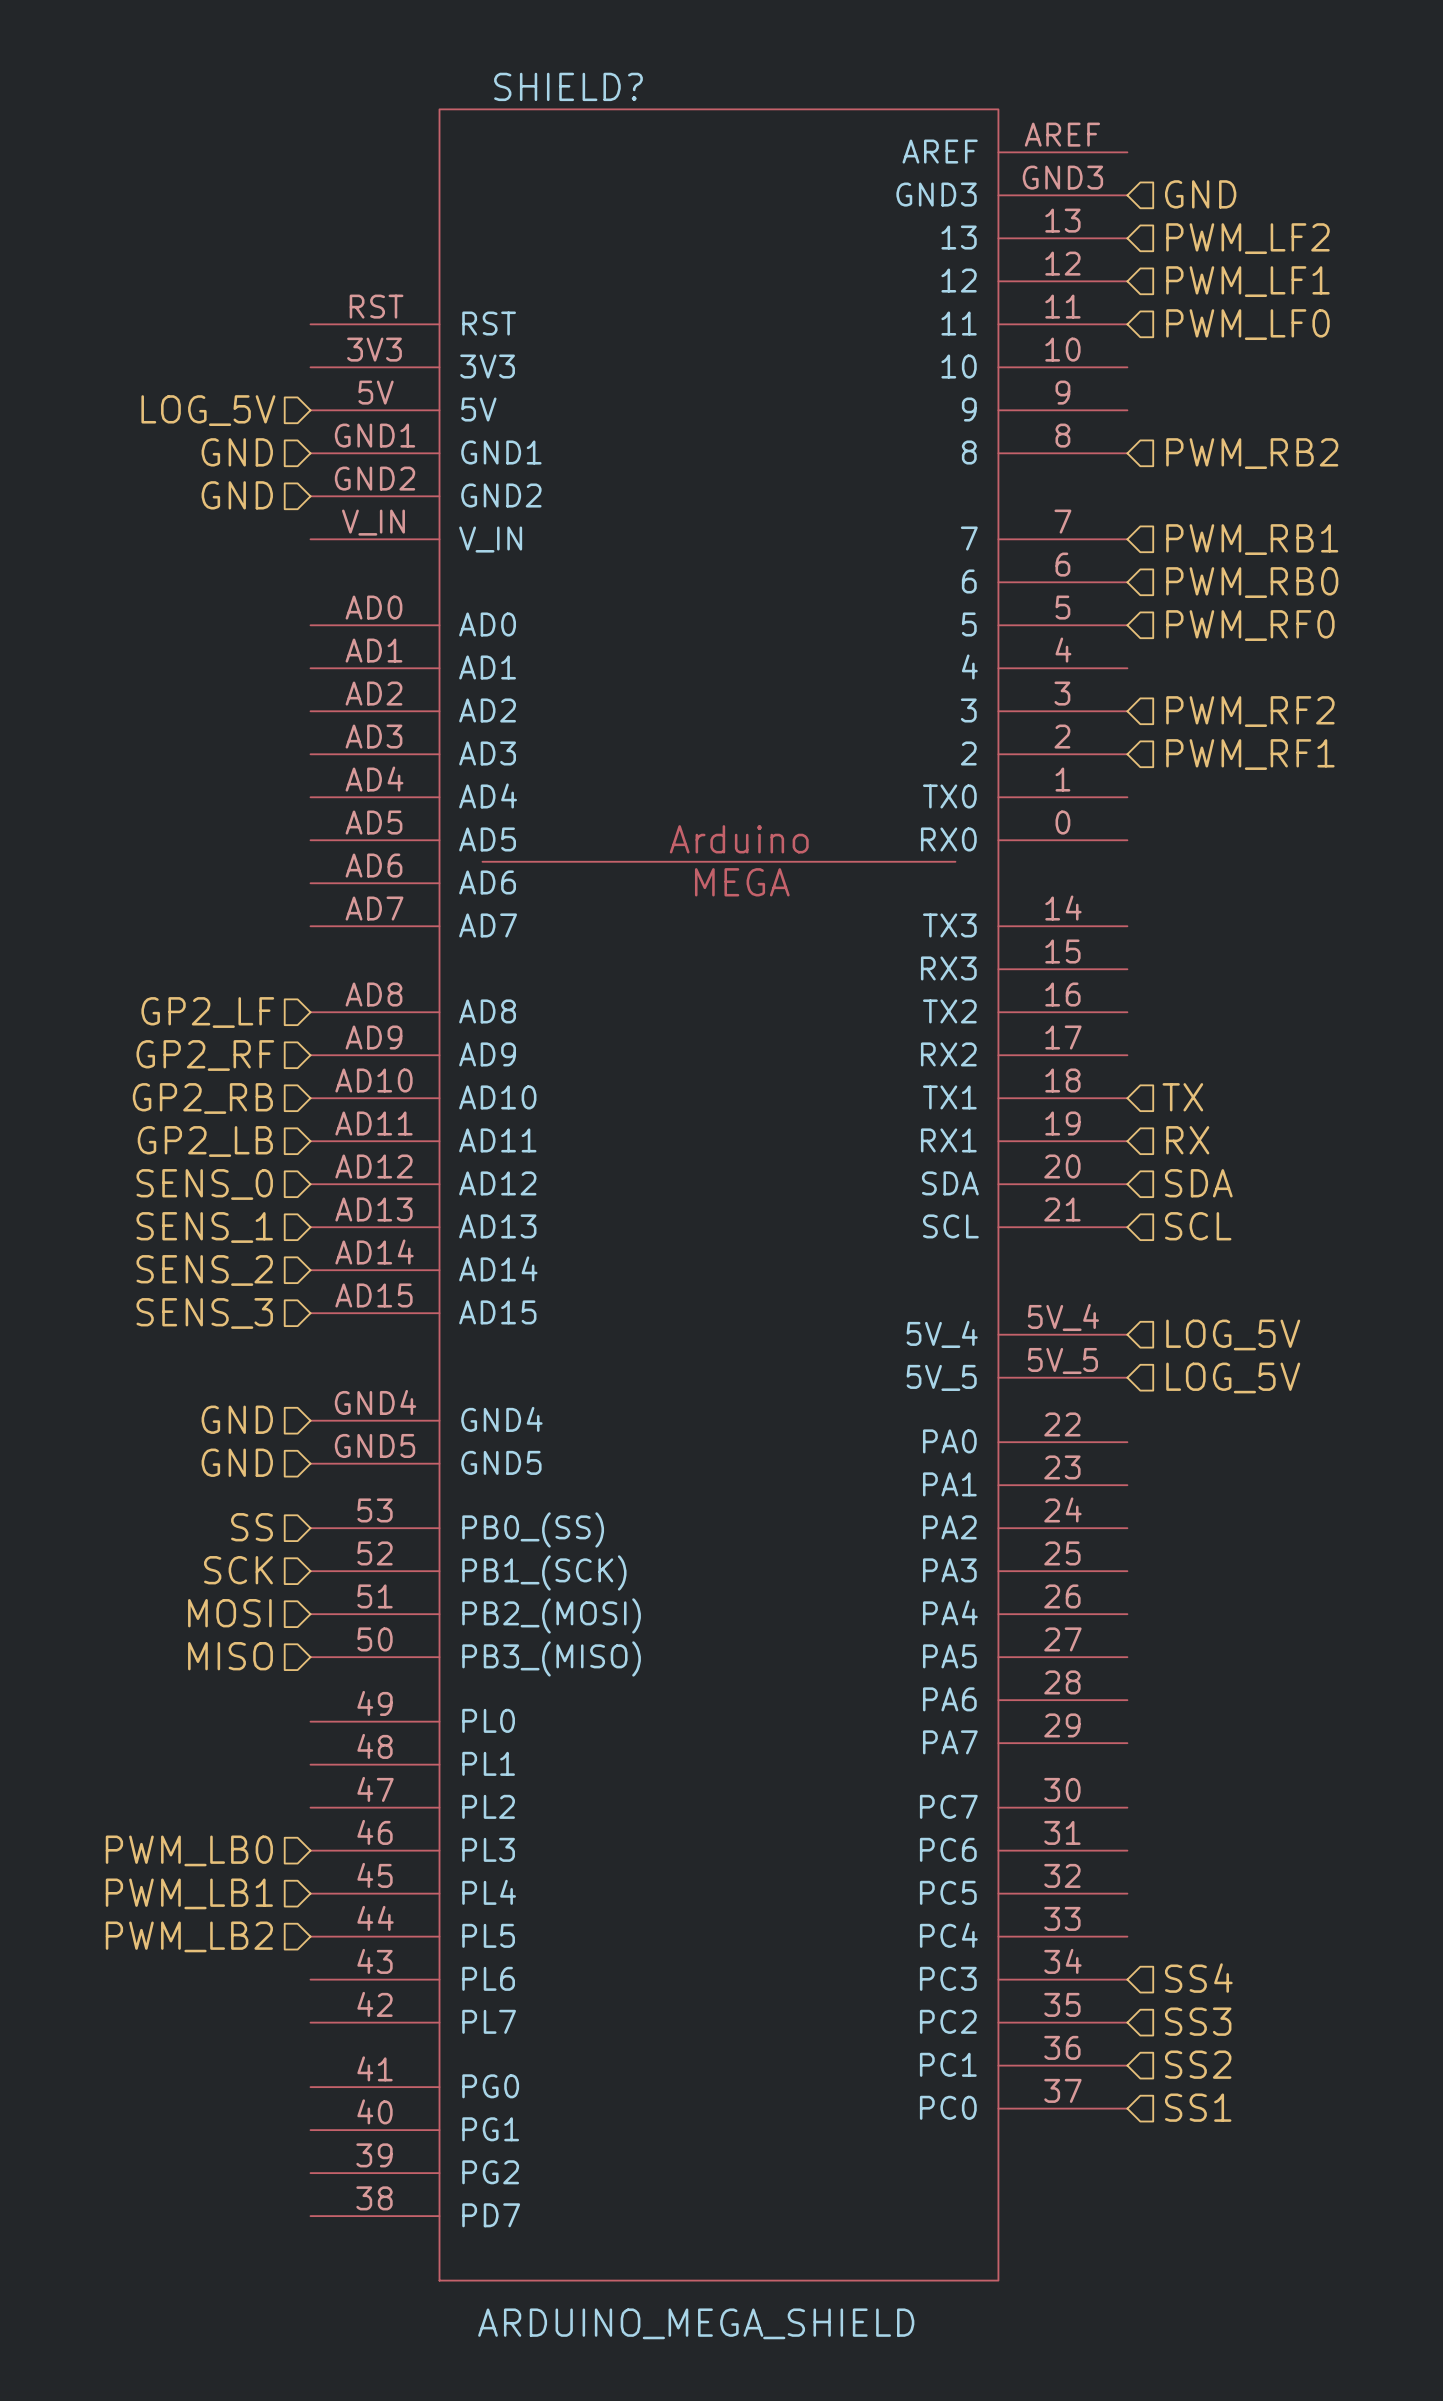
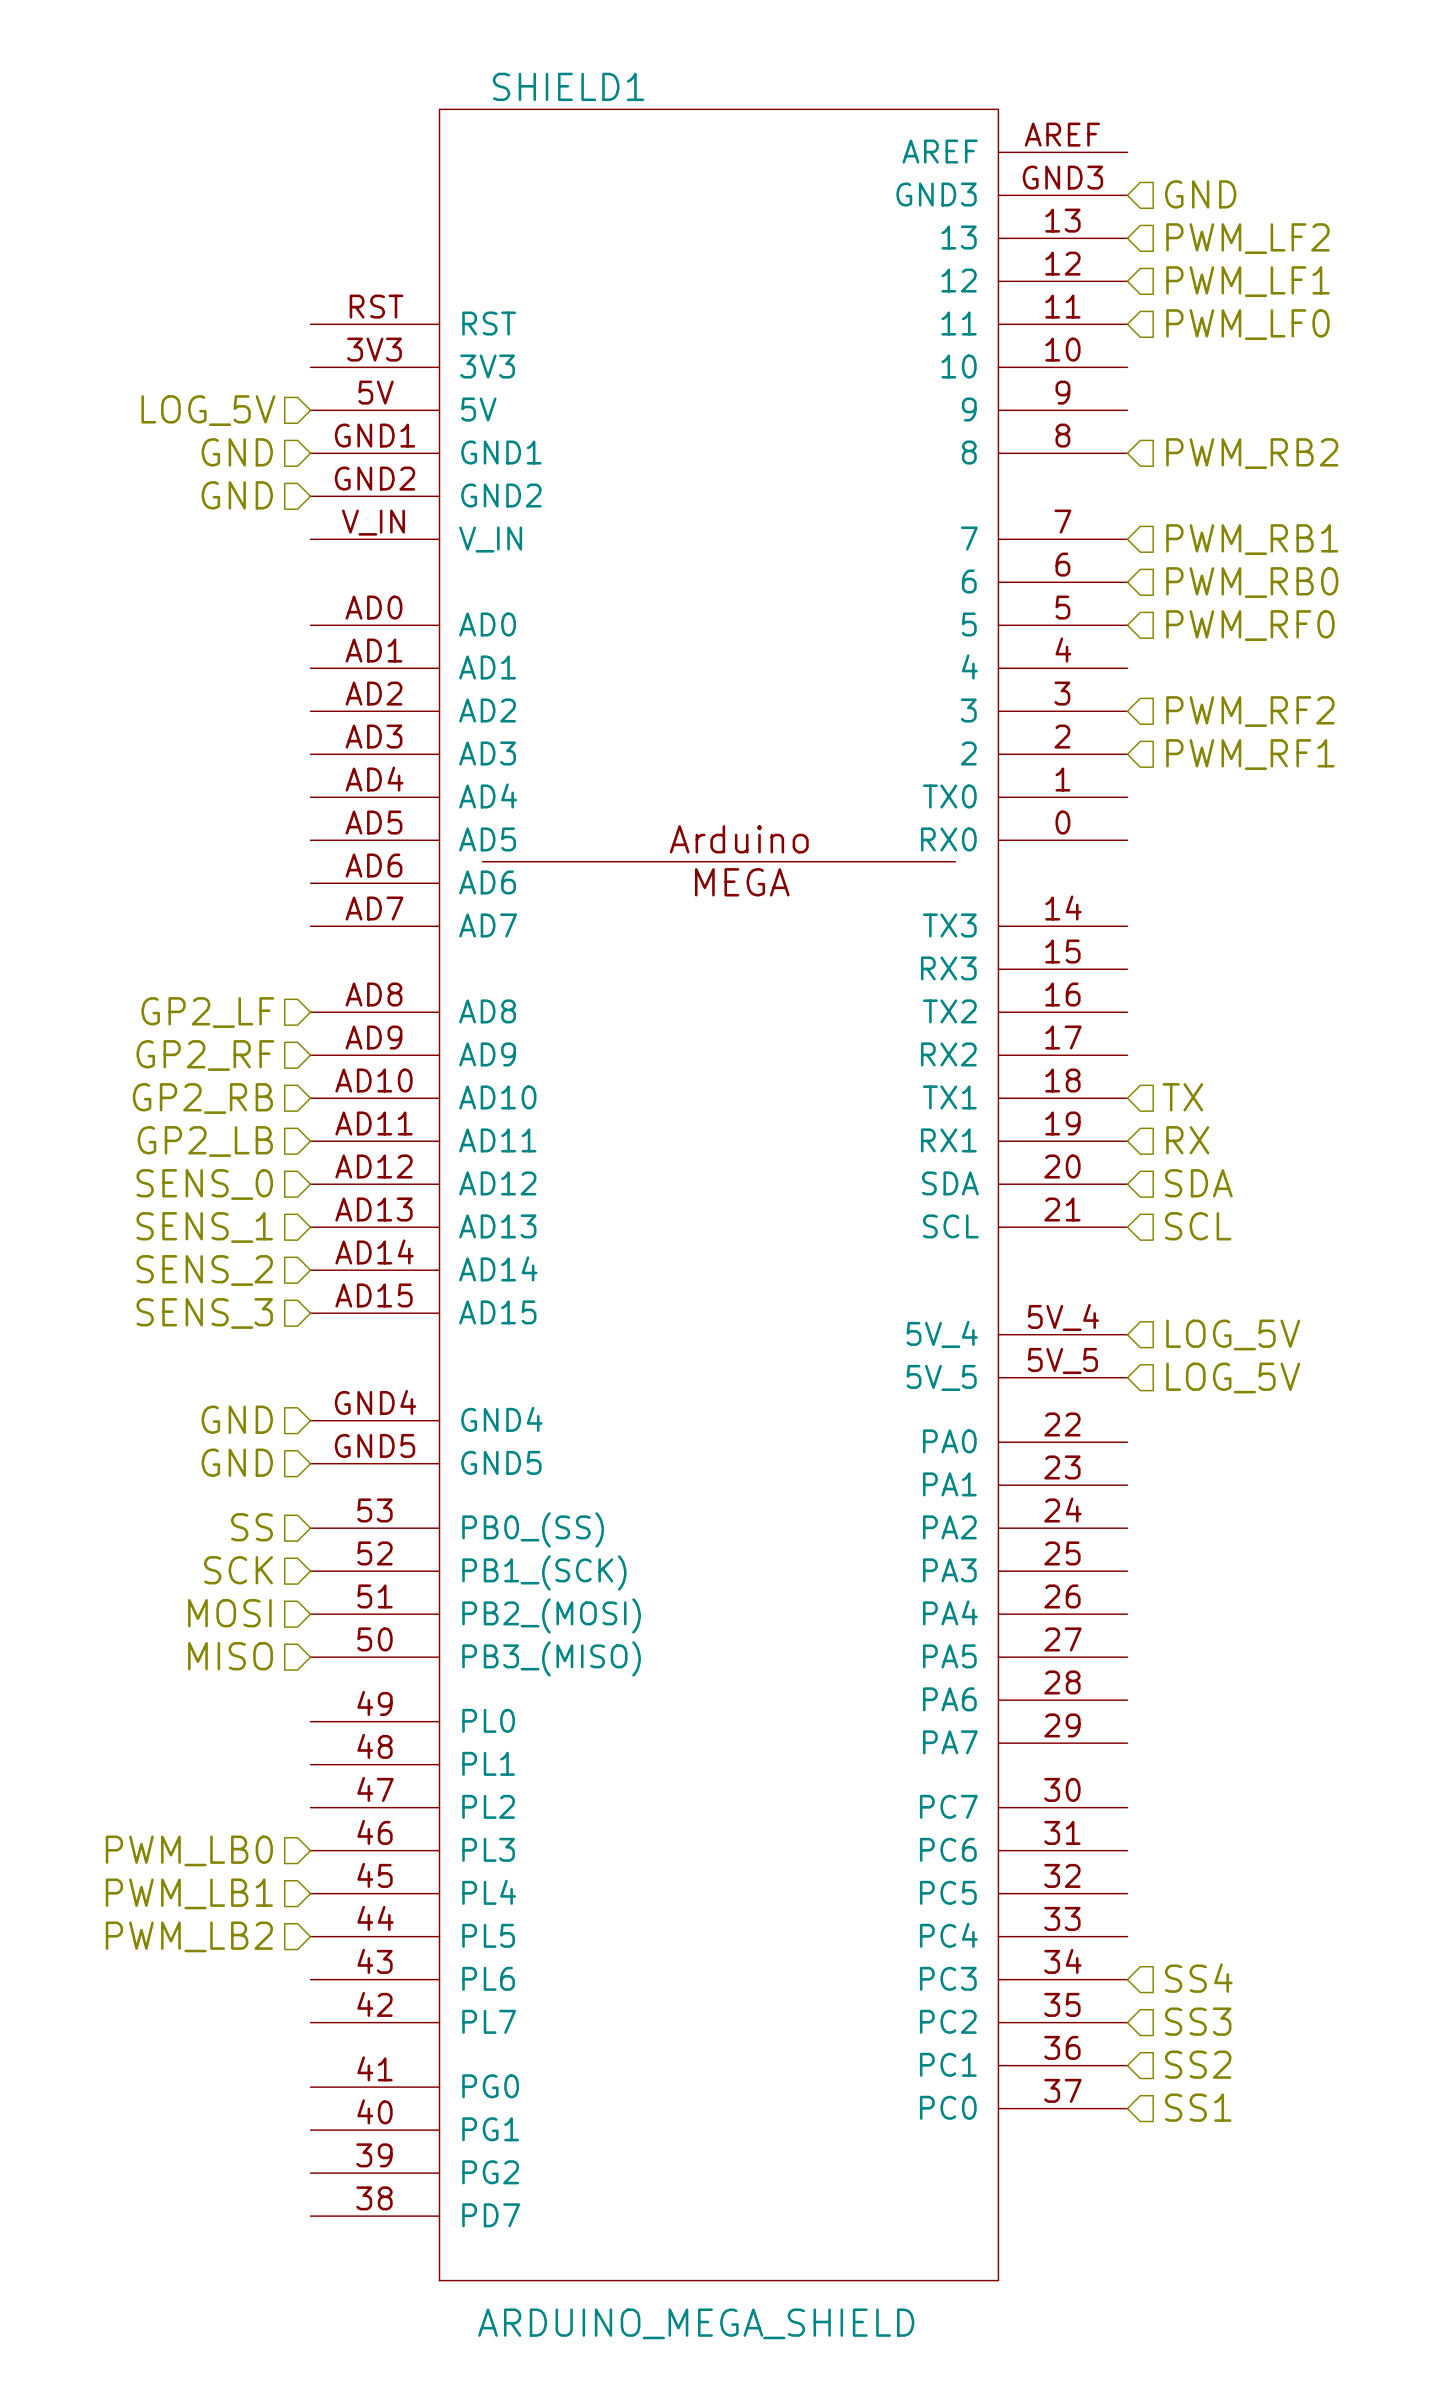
SHIELD? name: SHIELD? (568, 86) -> SHIELD1 (568, 86)

